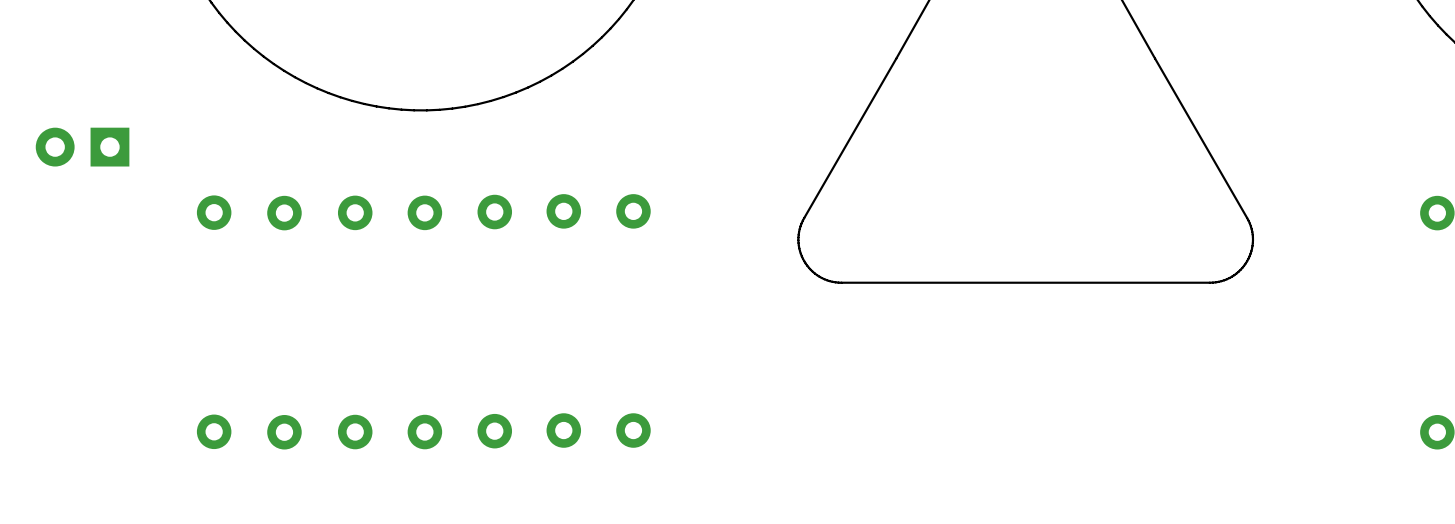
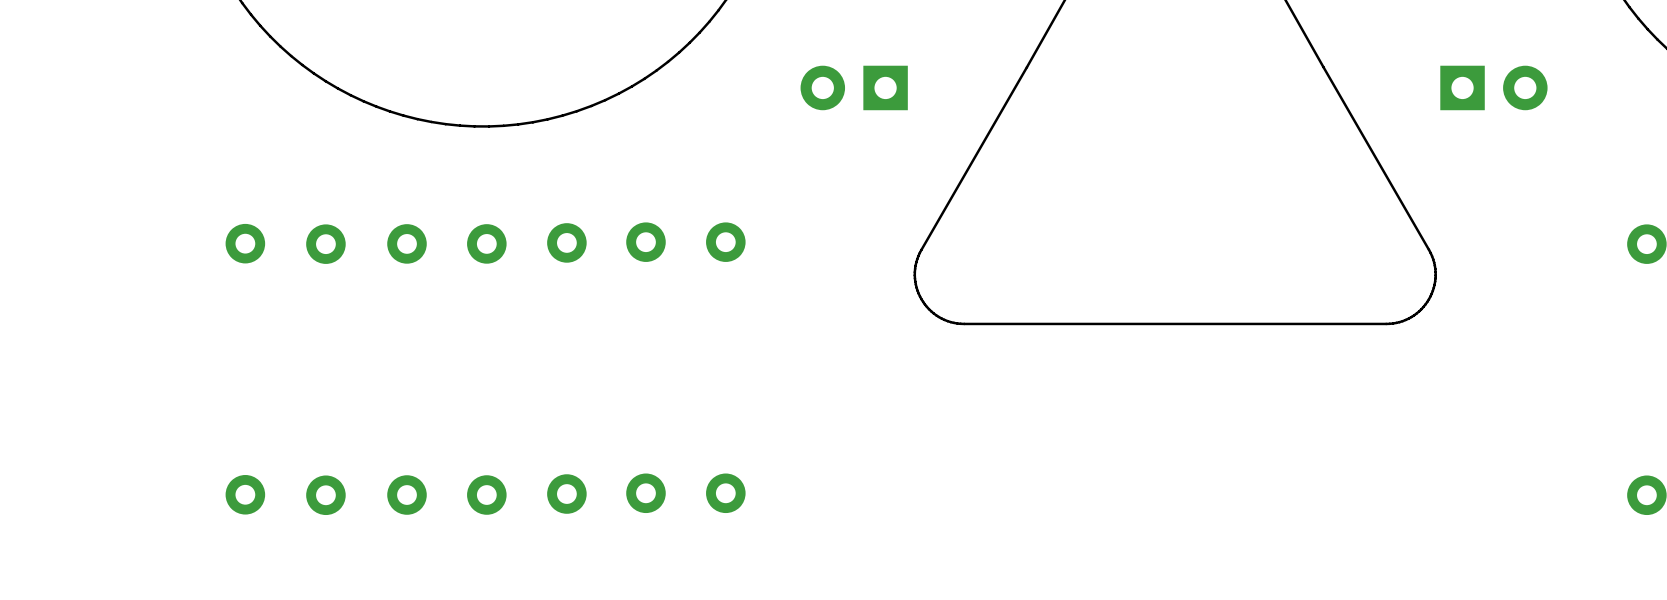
part: none -> (854, 87)
part: none -> (1493, 87)
part: (82, 147) -> none

